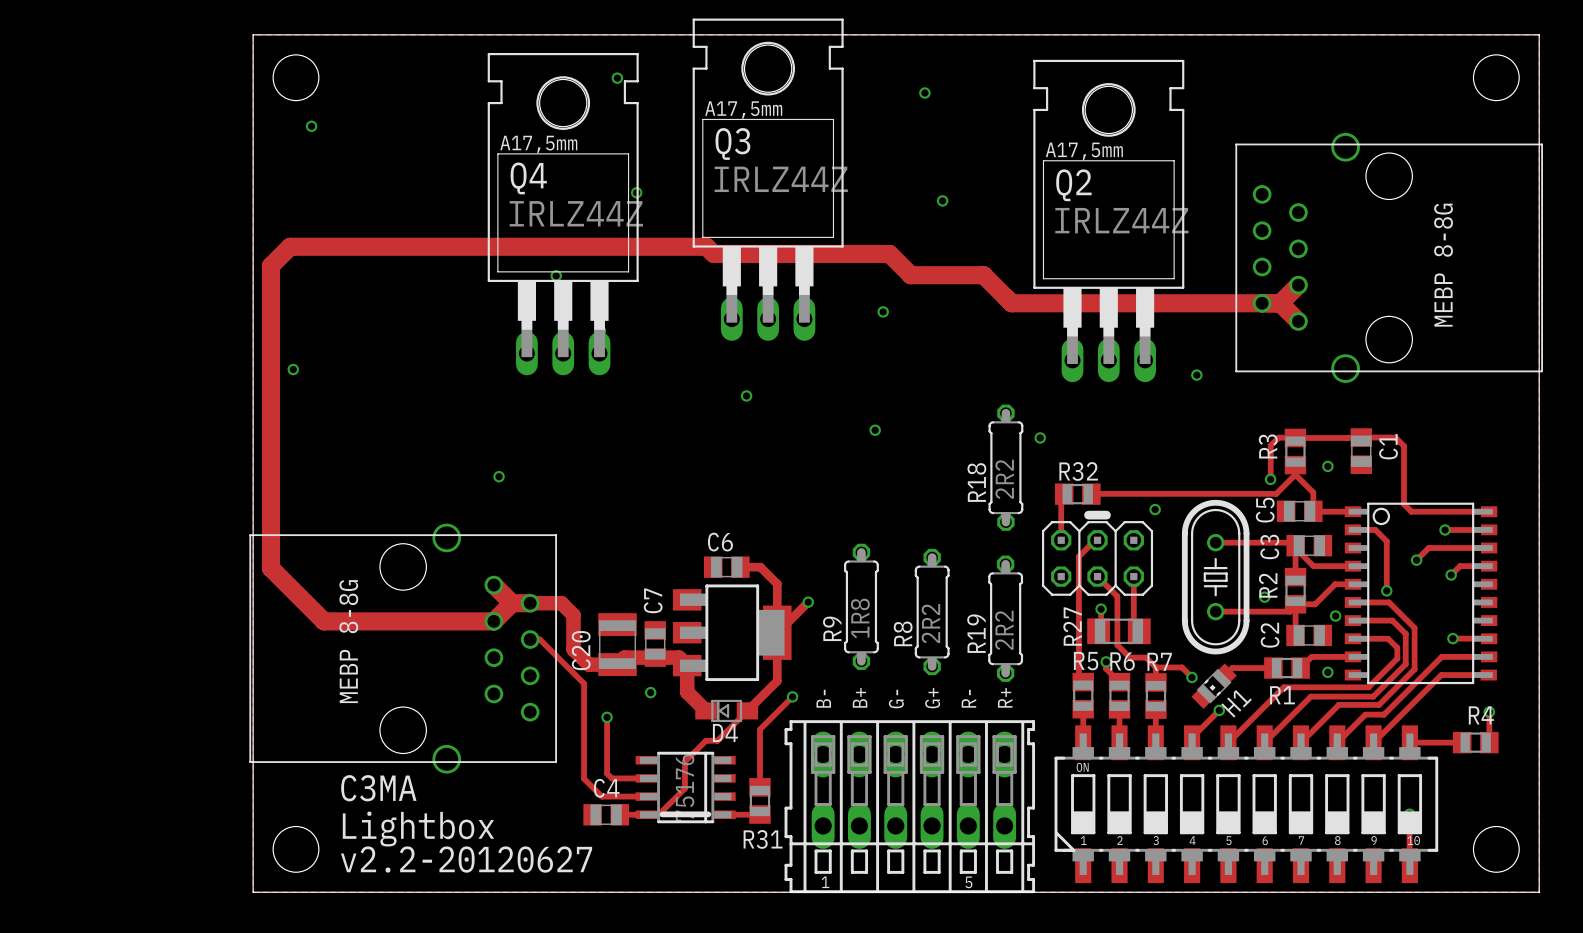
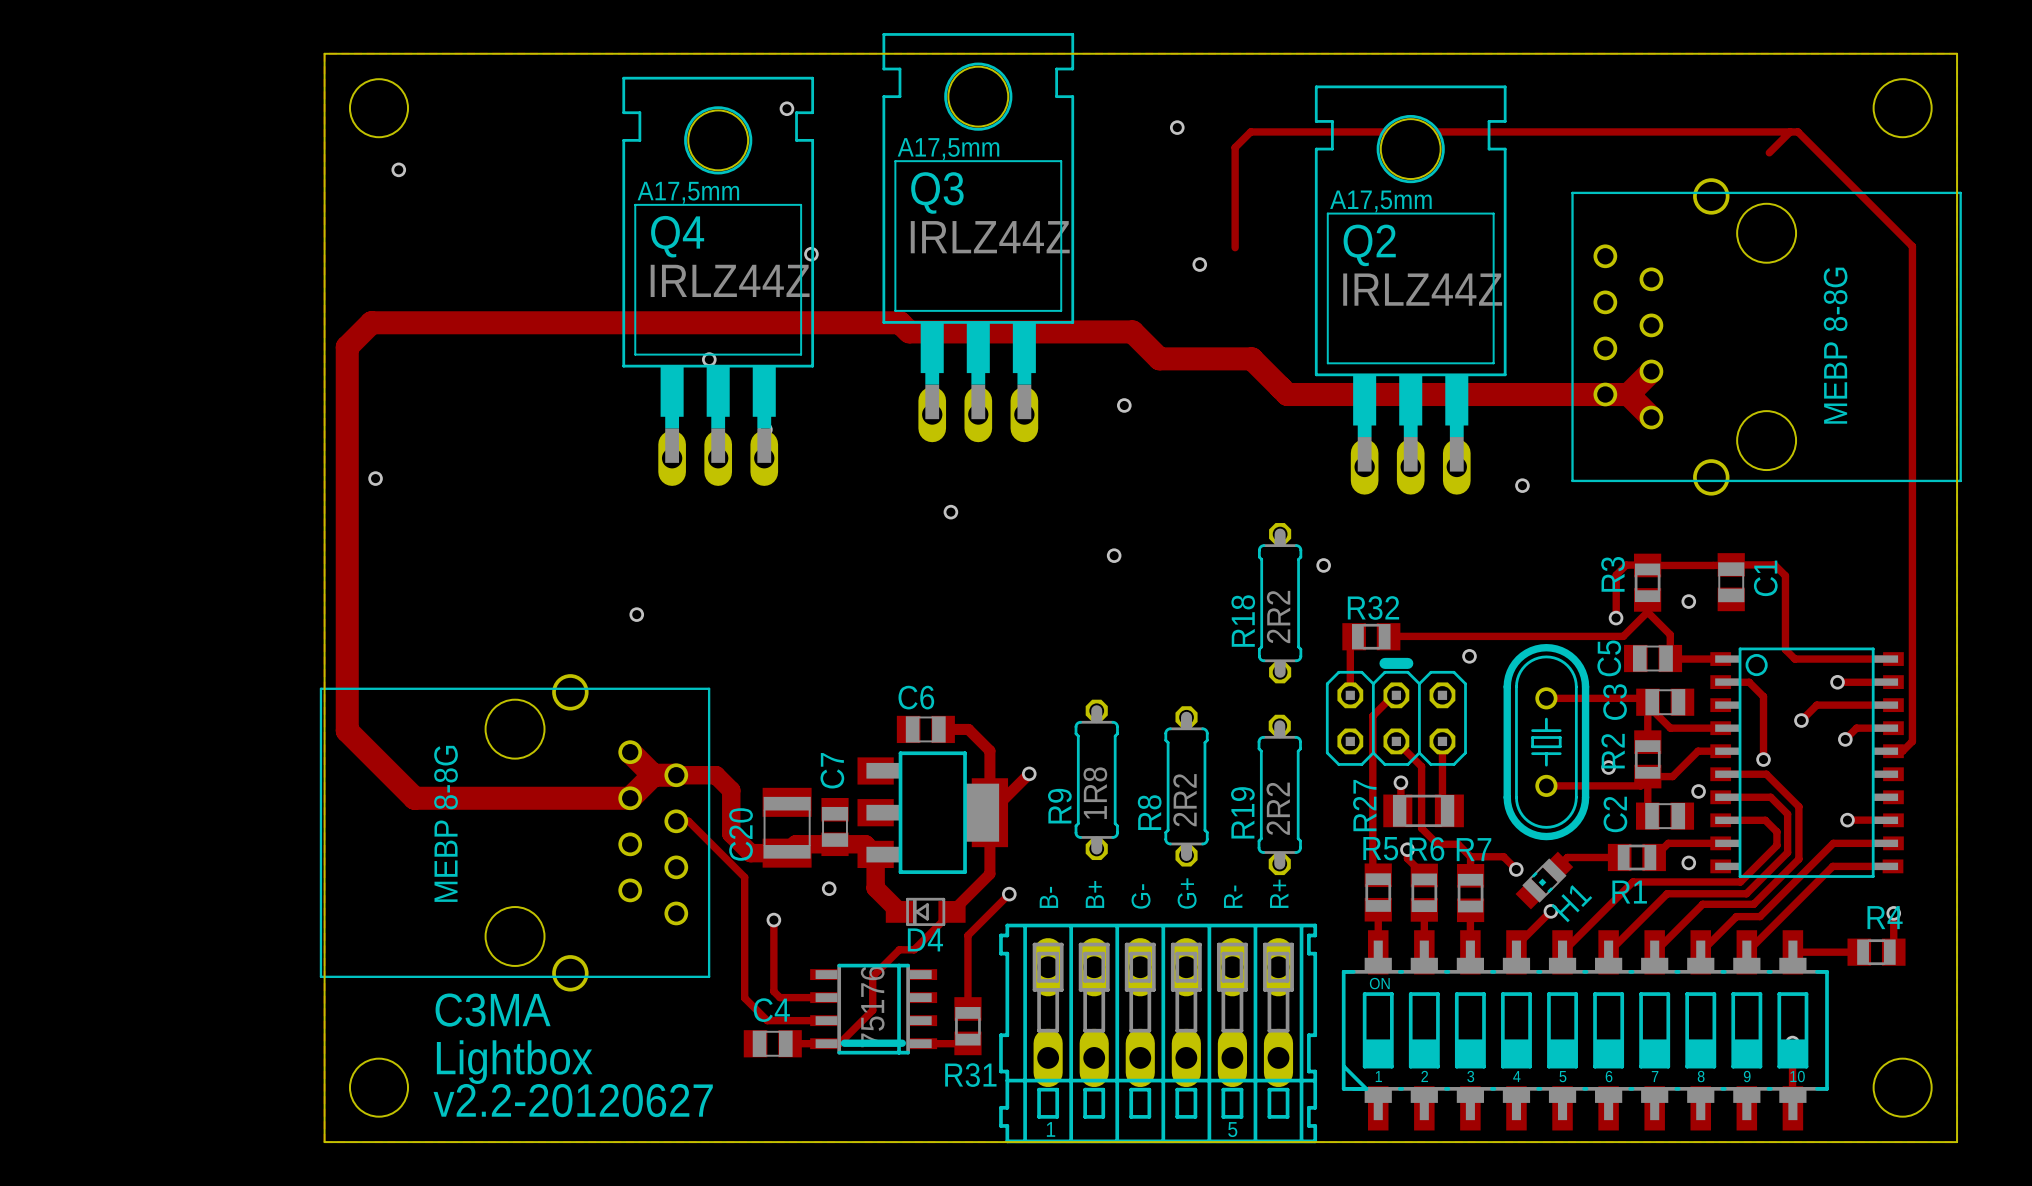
track: none -> (1790, 131) (1769, 152)
track: none -> (1235, 247) (1235, 147) (1250, 131) (1797, 131) (1912, 246) (1912, 741) (1902, 751) (1893, 751)

